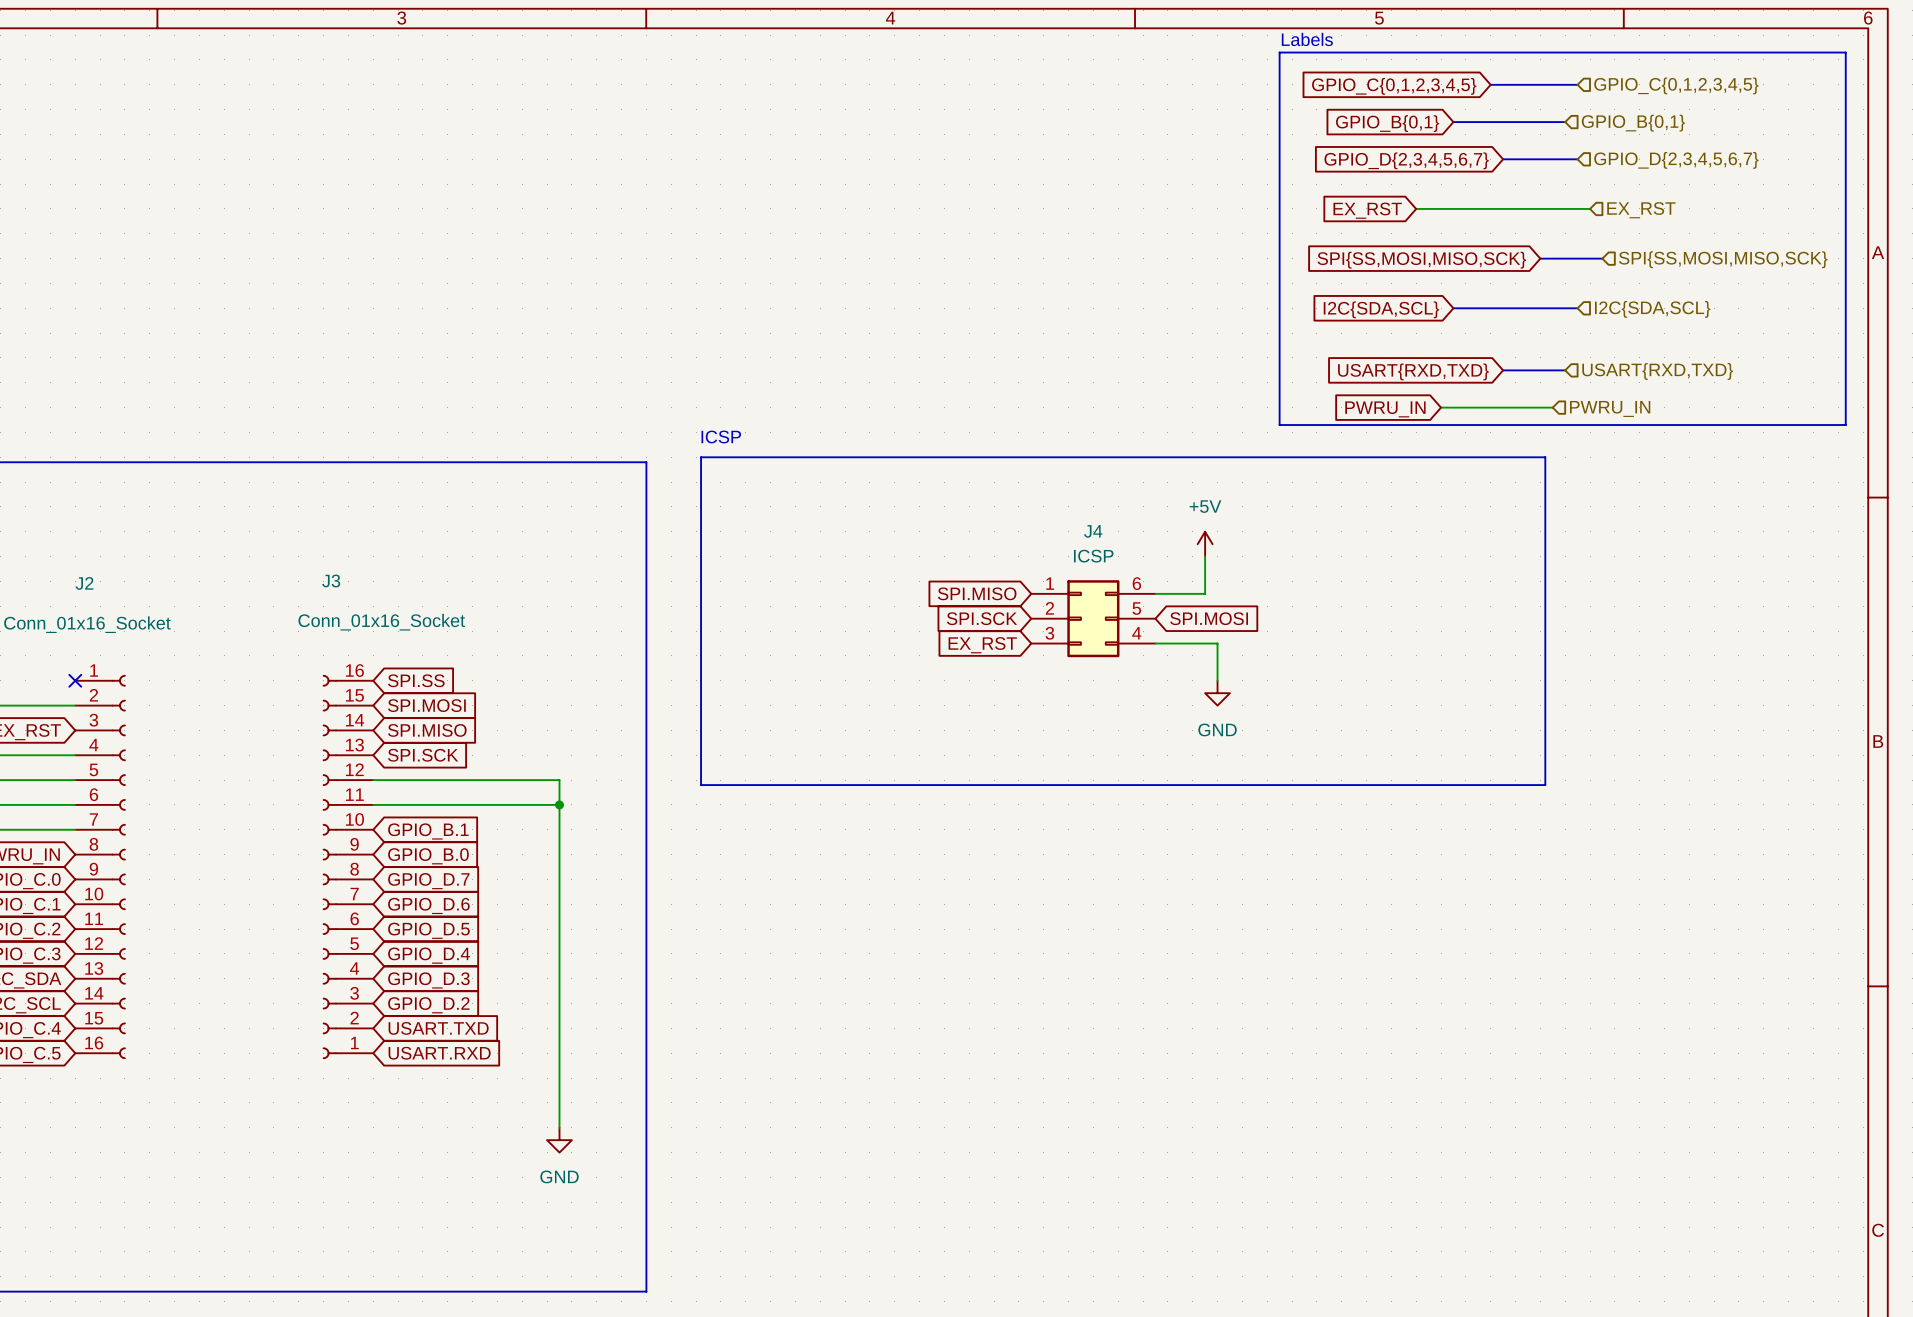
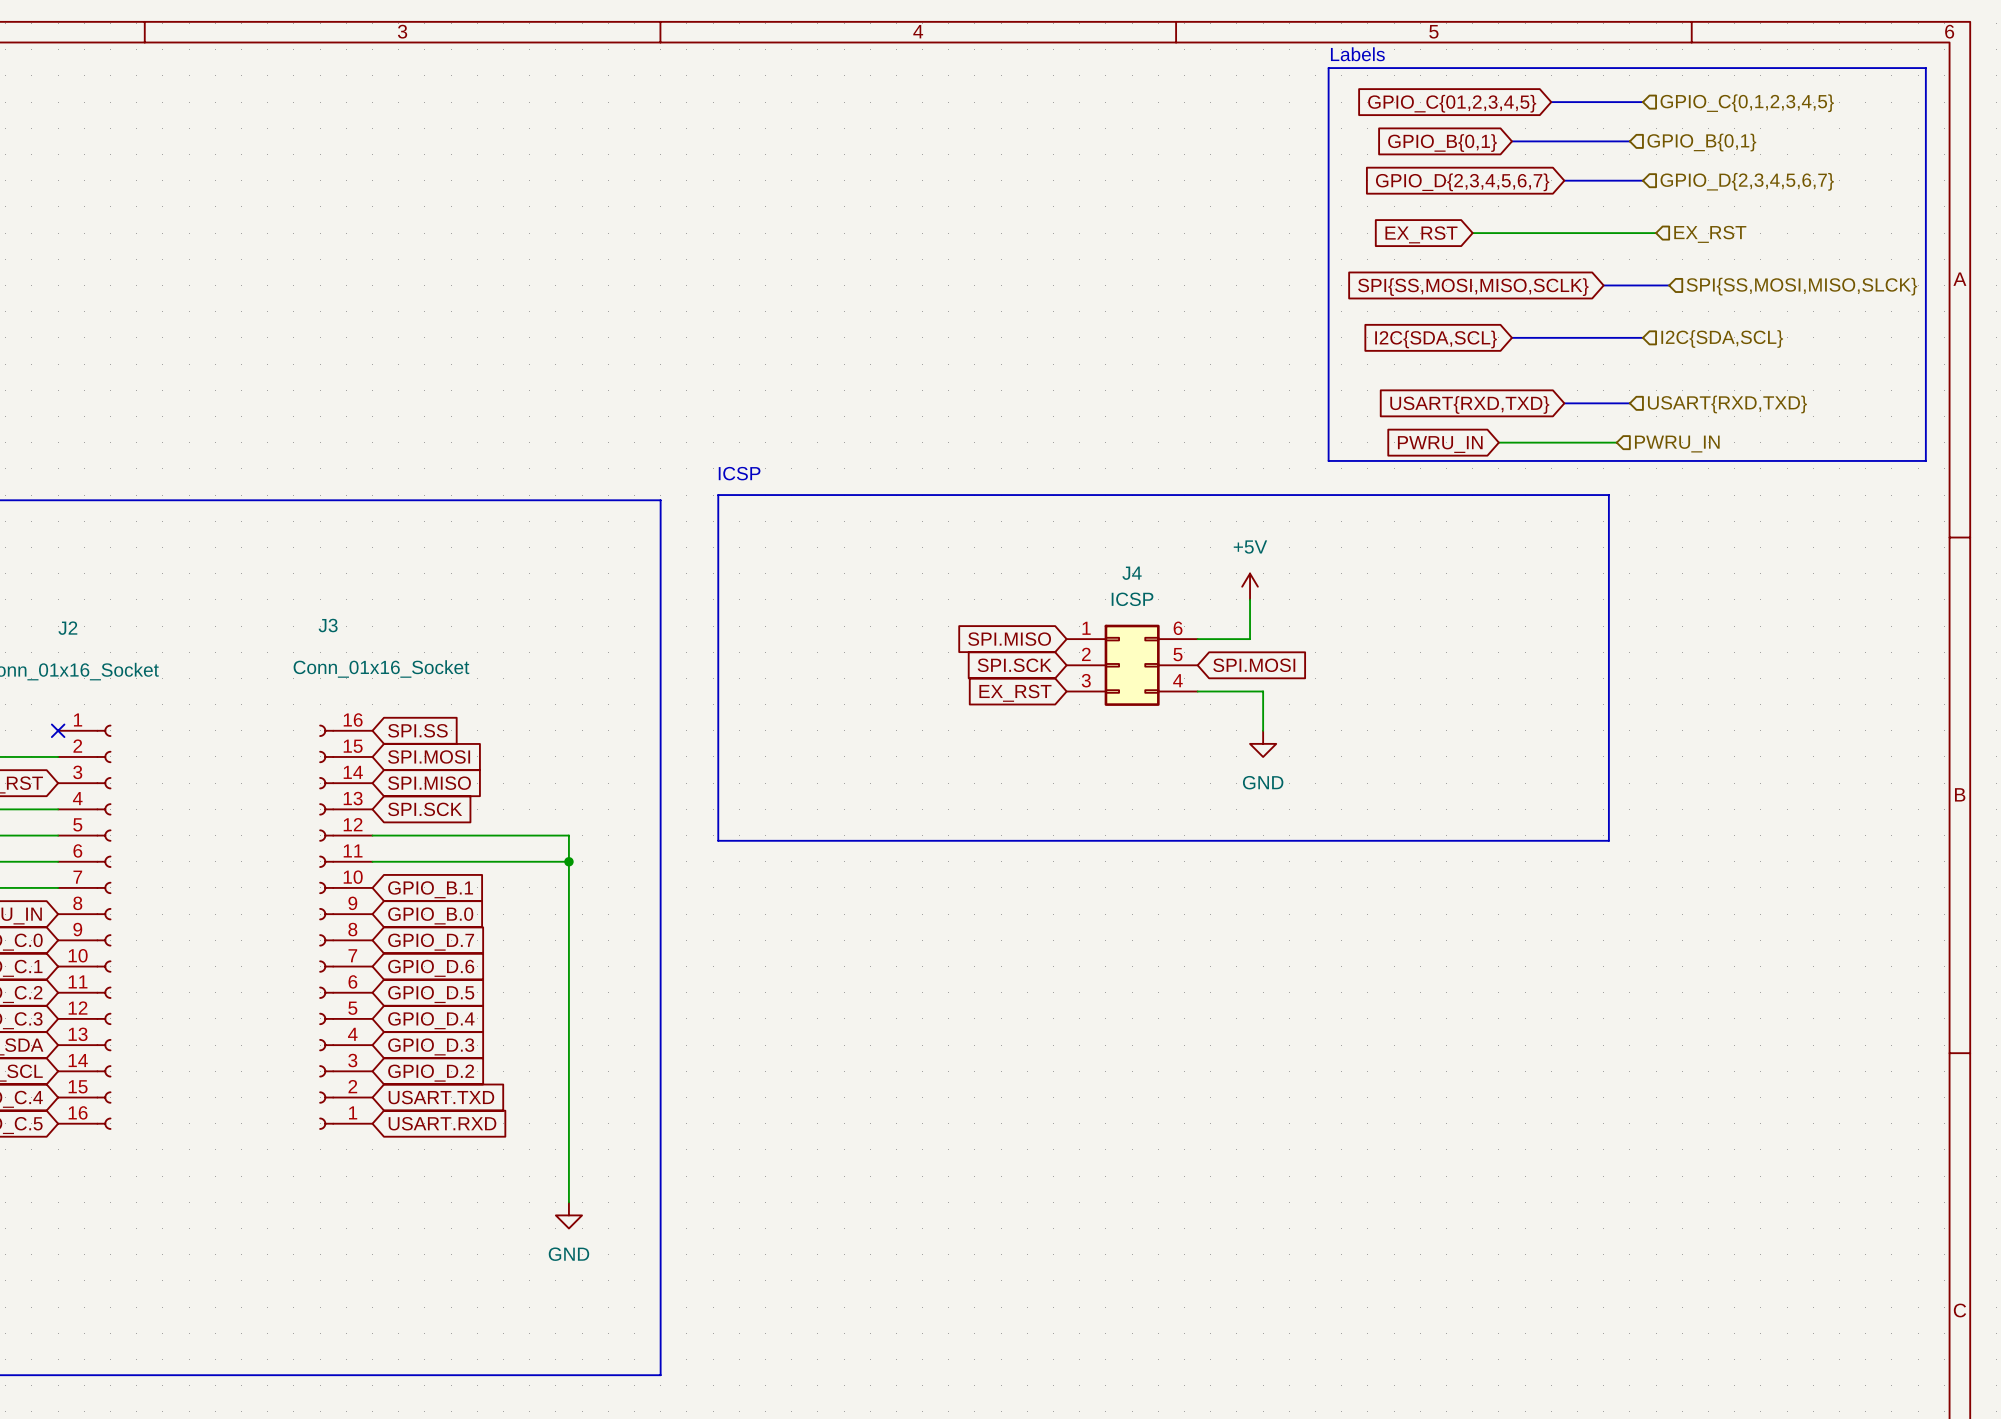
global label: GPIO_C{0,1,2,3,4,5} (1394, 86) -> GPIO_C{01,2,3,4,5} (1452, 103)
hierarchical label: SPI{SS,MOSI,MISO,SCK} (1723, 259) -> SPI{SS,MOSI,MISO,SLCK} (1801, 286)
global label: SPI{SS,MOSI,MISO,SCK} (1421, 260) -> SPI{SS,MOSI,MISO,SCLK} (1473, 287)

